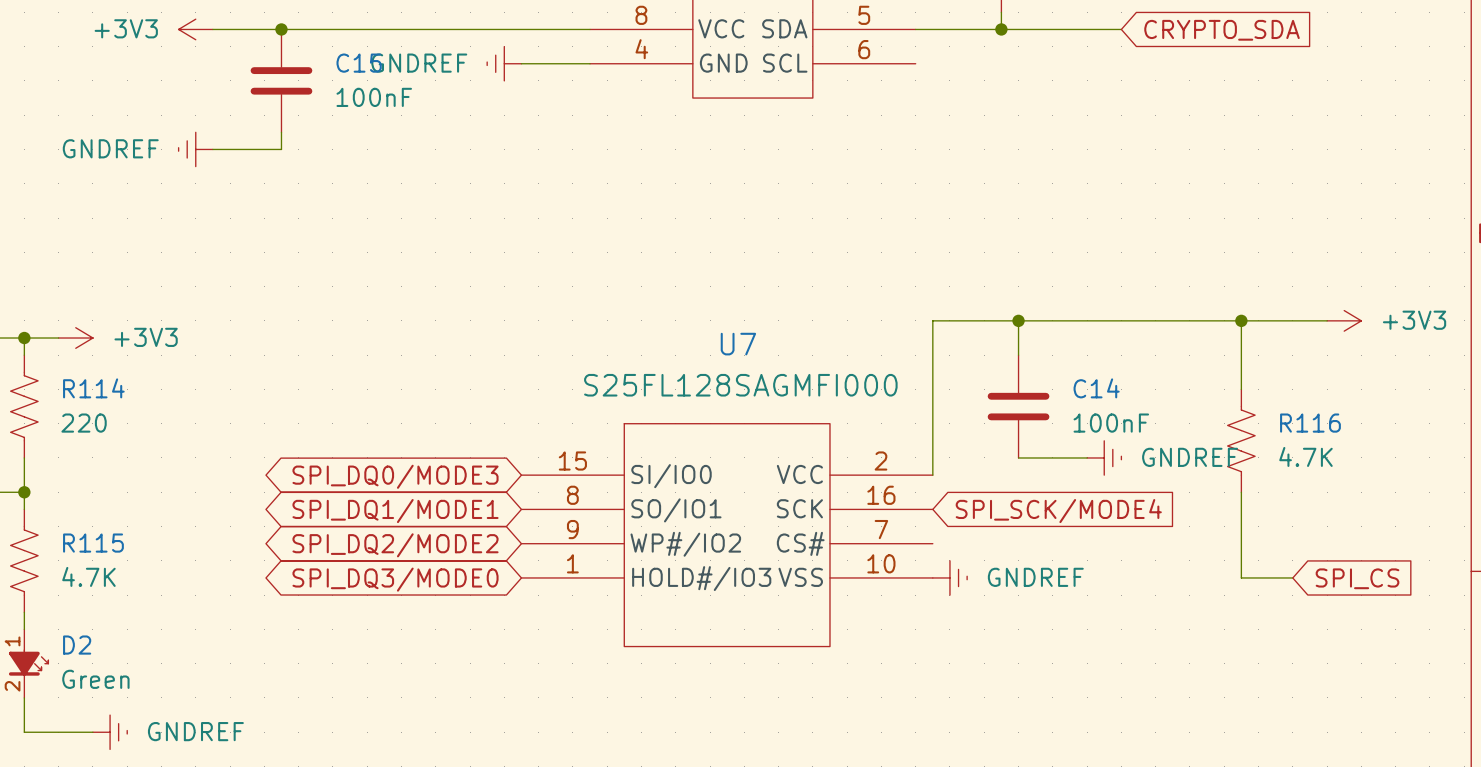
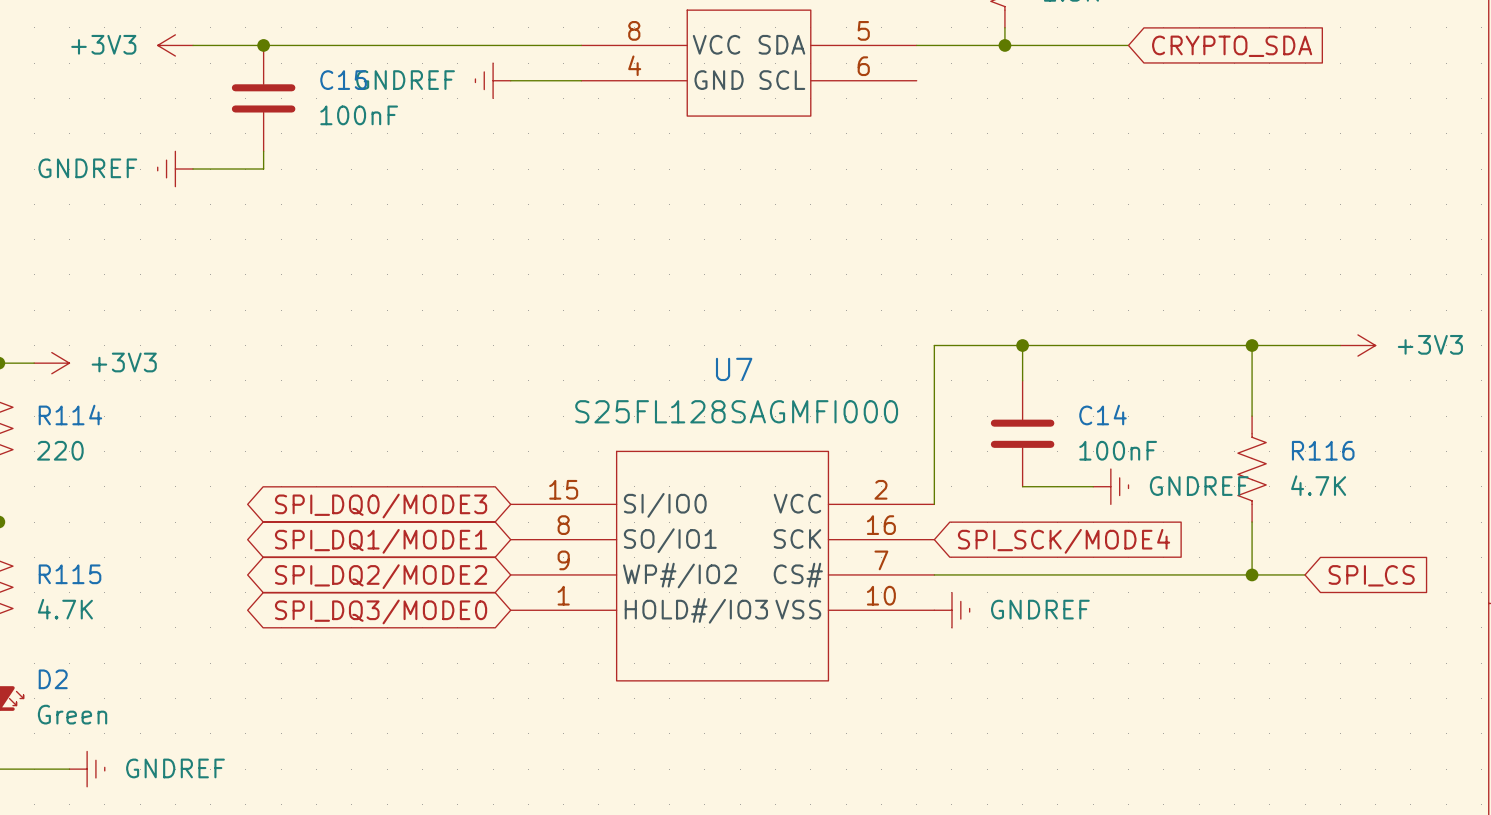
wire: none -> (934, 574) (1305, 574)
wire: (1241, 543) (1241, 577) (1292, 577) -> none
junction: none -> (1252, 574)
global label position: SPI_CS (1357, 578) -> SPI_CS (1371, 575)

